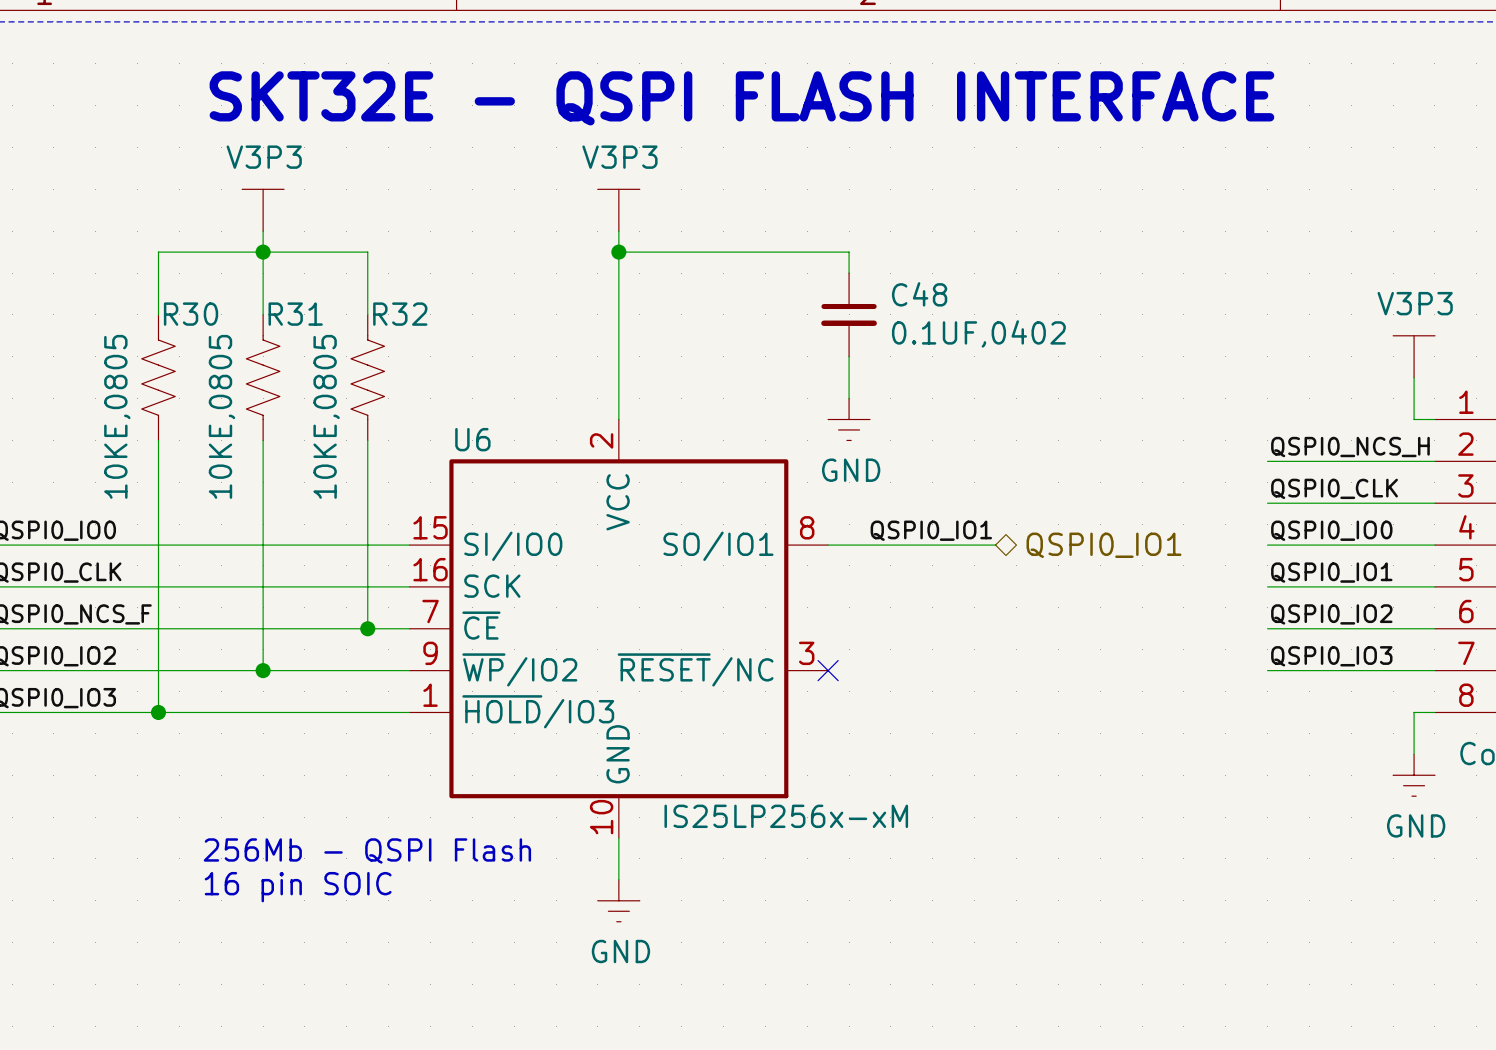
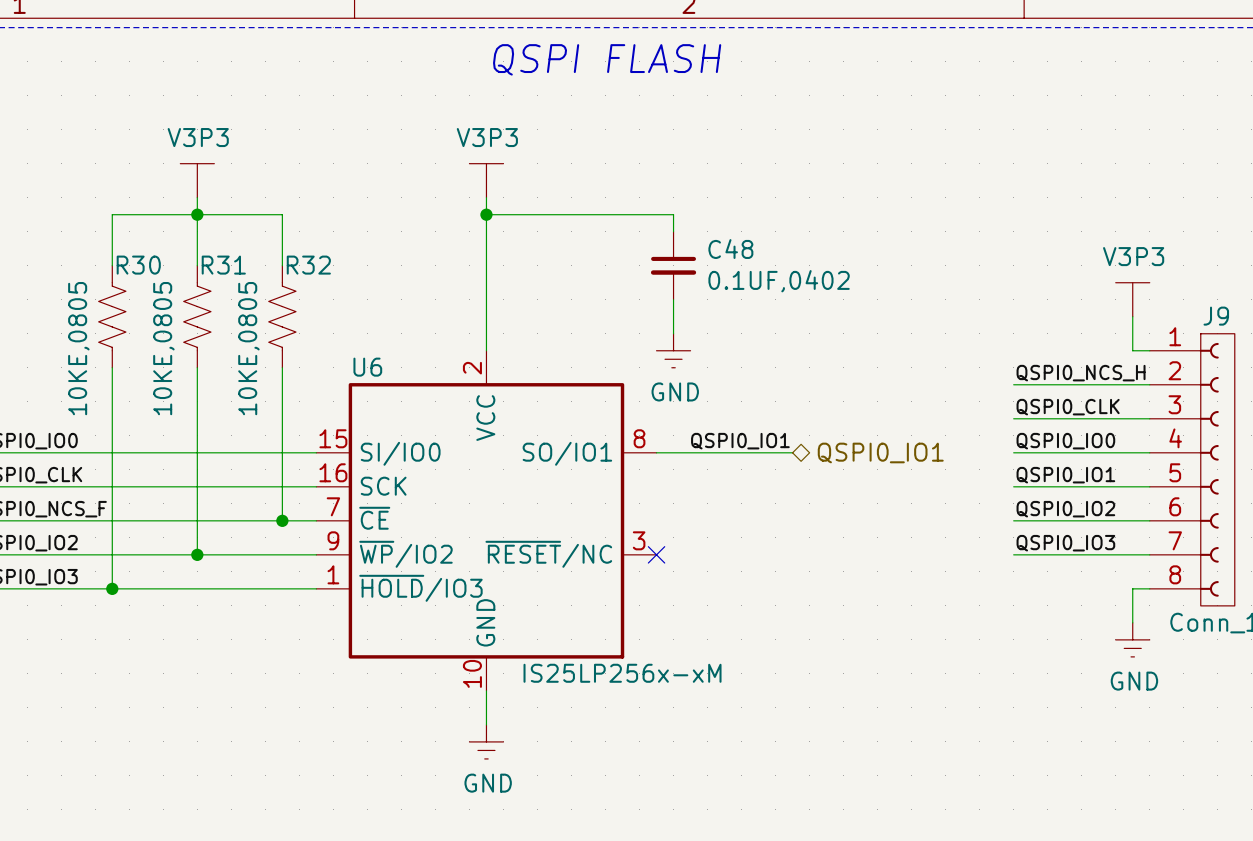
text: none -> QSPI FLASH (607, 59)
text: SKT32E - QSPI FLASH INTERFACE (741, 98) -> none
text: 256Mb - QSPI Flash (367, 850) -> none
text: 16 pin SOIC (298, 887) -> none

